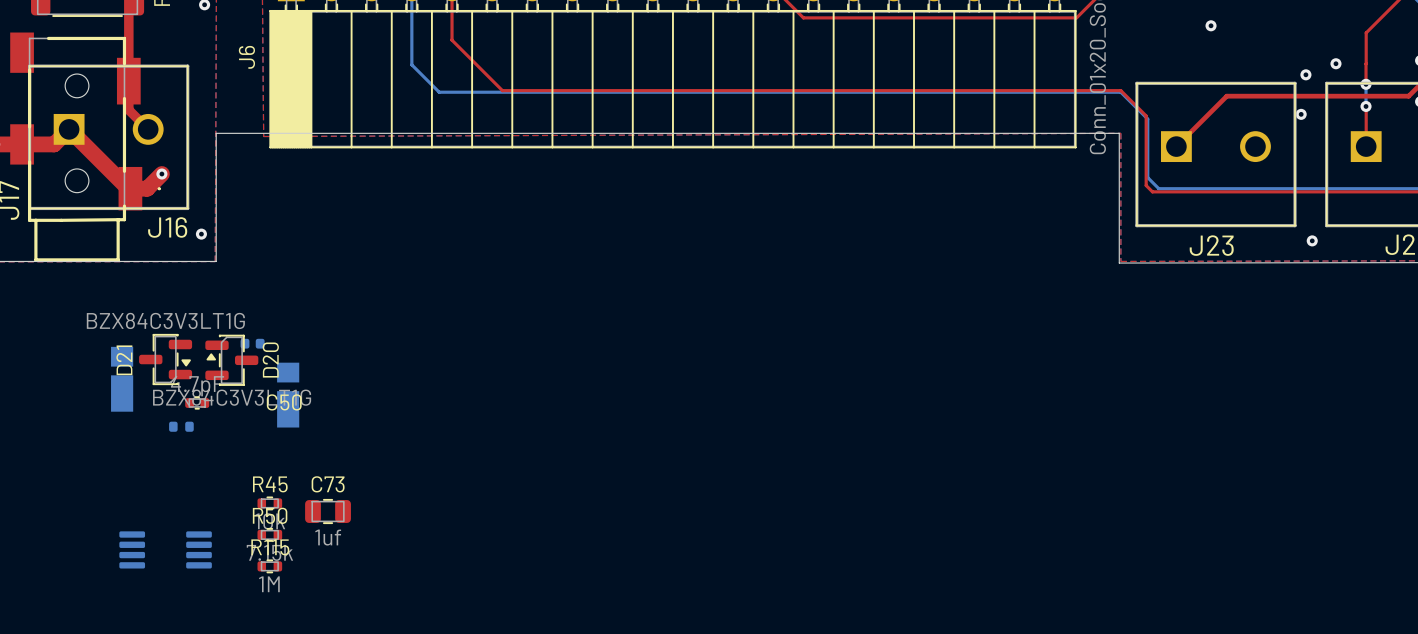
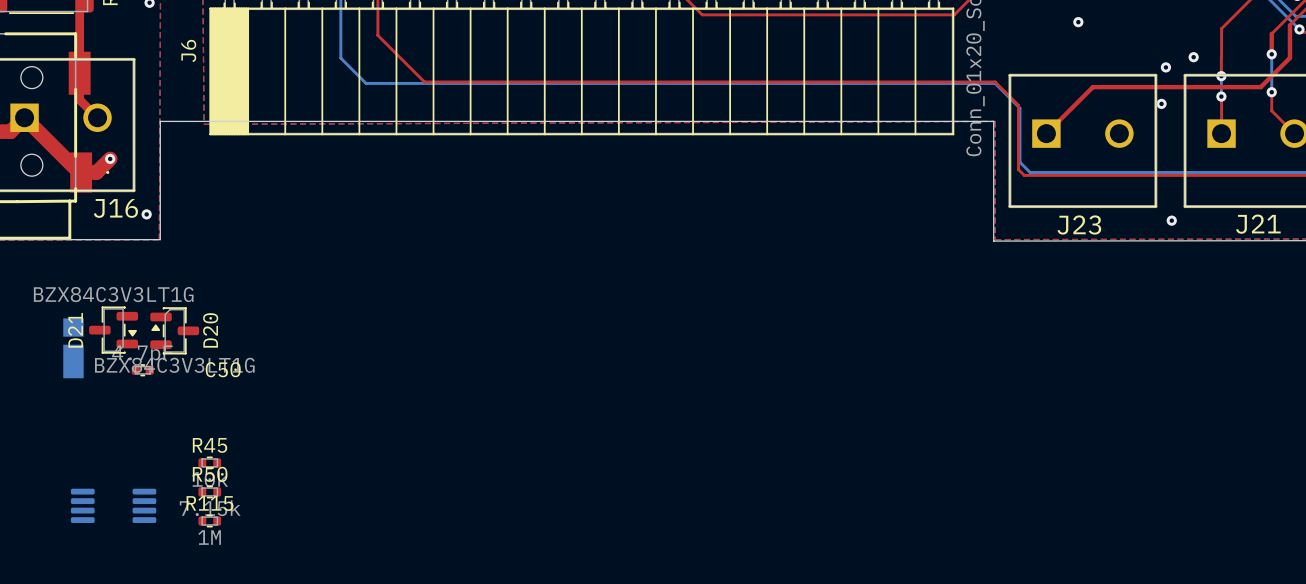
part: (252, 343) -> none
part: (288, 395) -> none
part: (181, 426) -> none
C73: 1uf (328, 511) -> none

